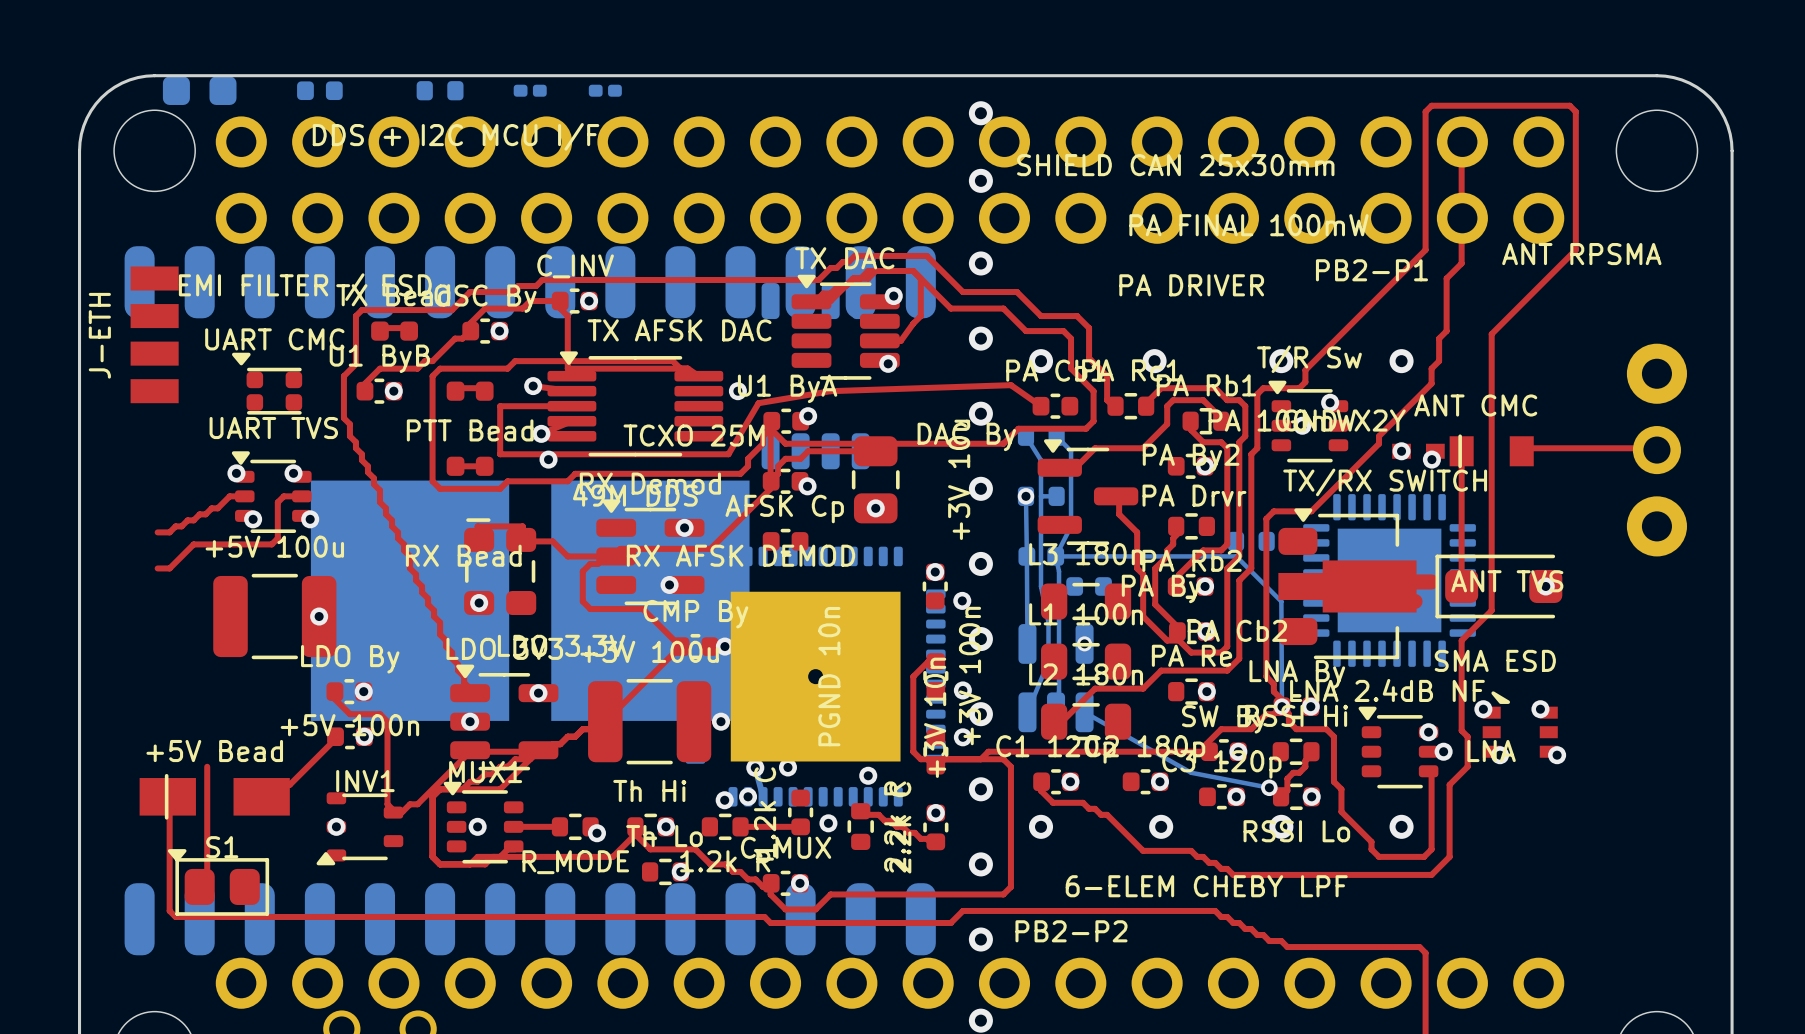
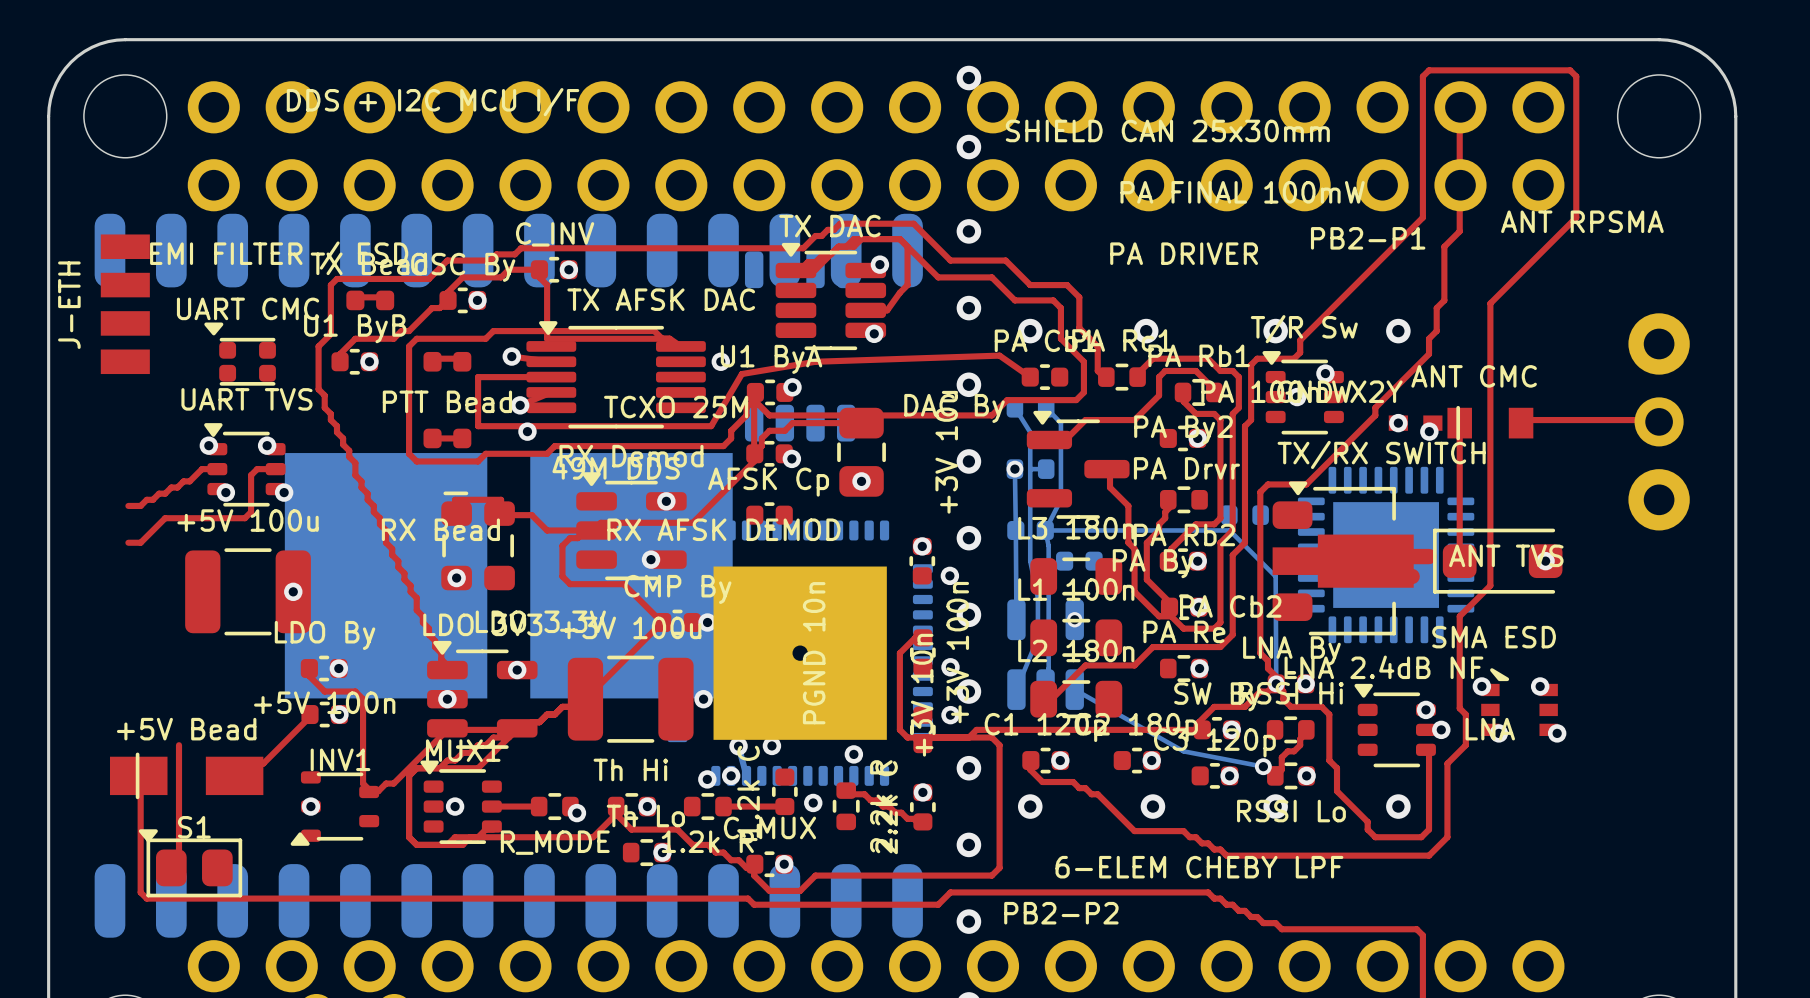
part: (199, 90) -> none
part: (319, 90) -> none
part: (440, 90) -> none
part: (530, 90) -> none
part: (605, 90) -> none

